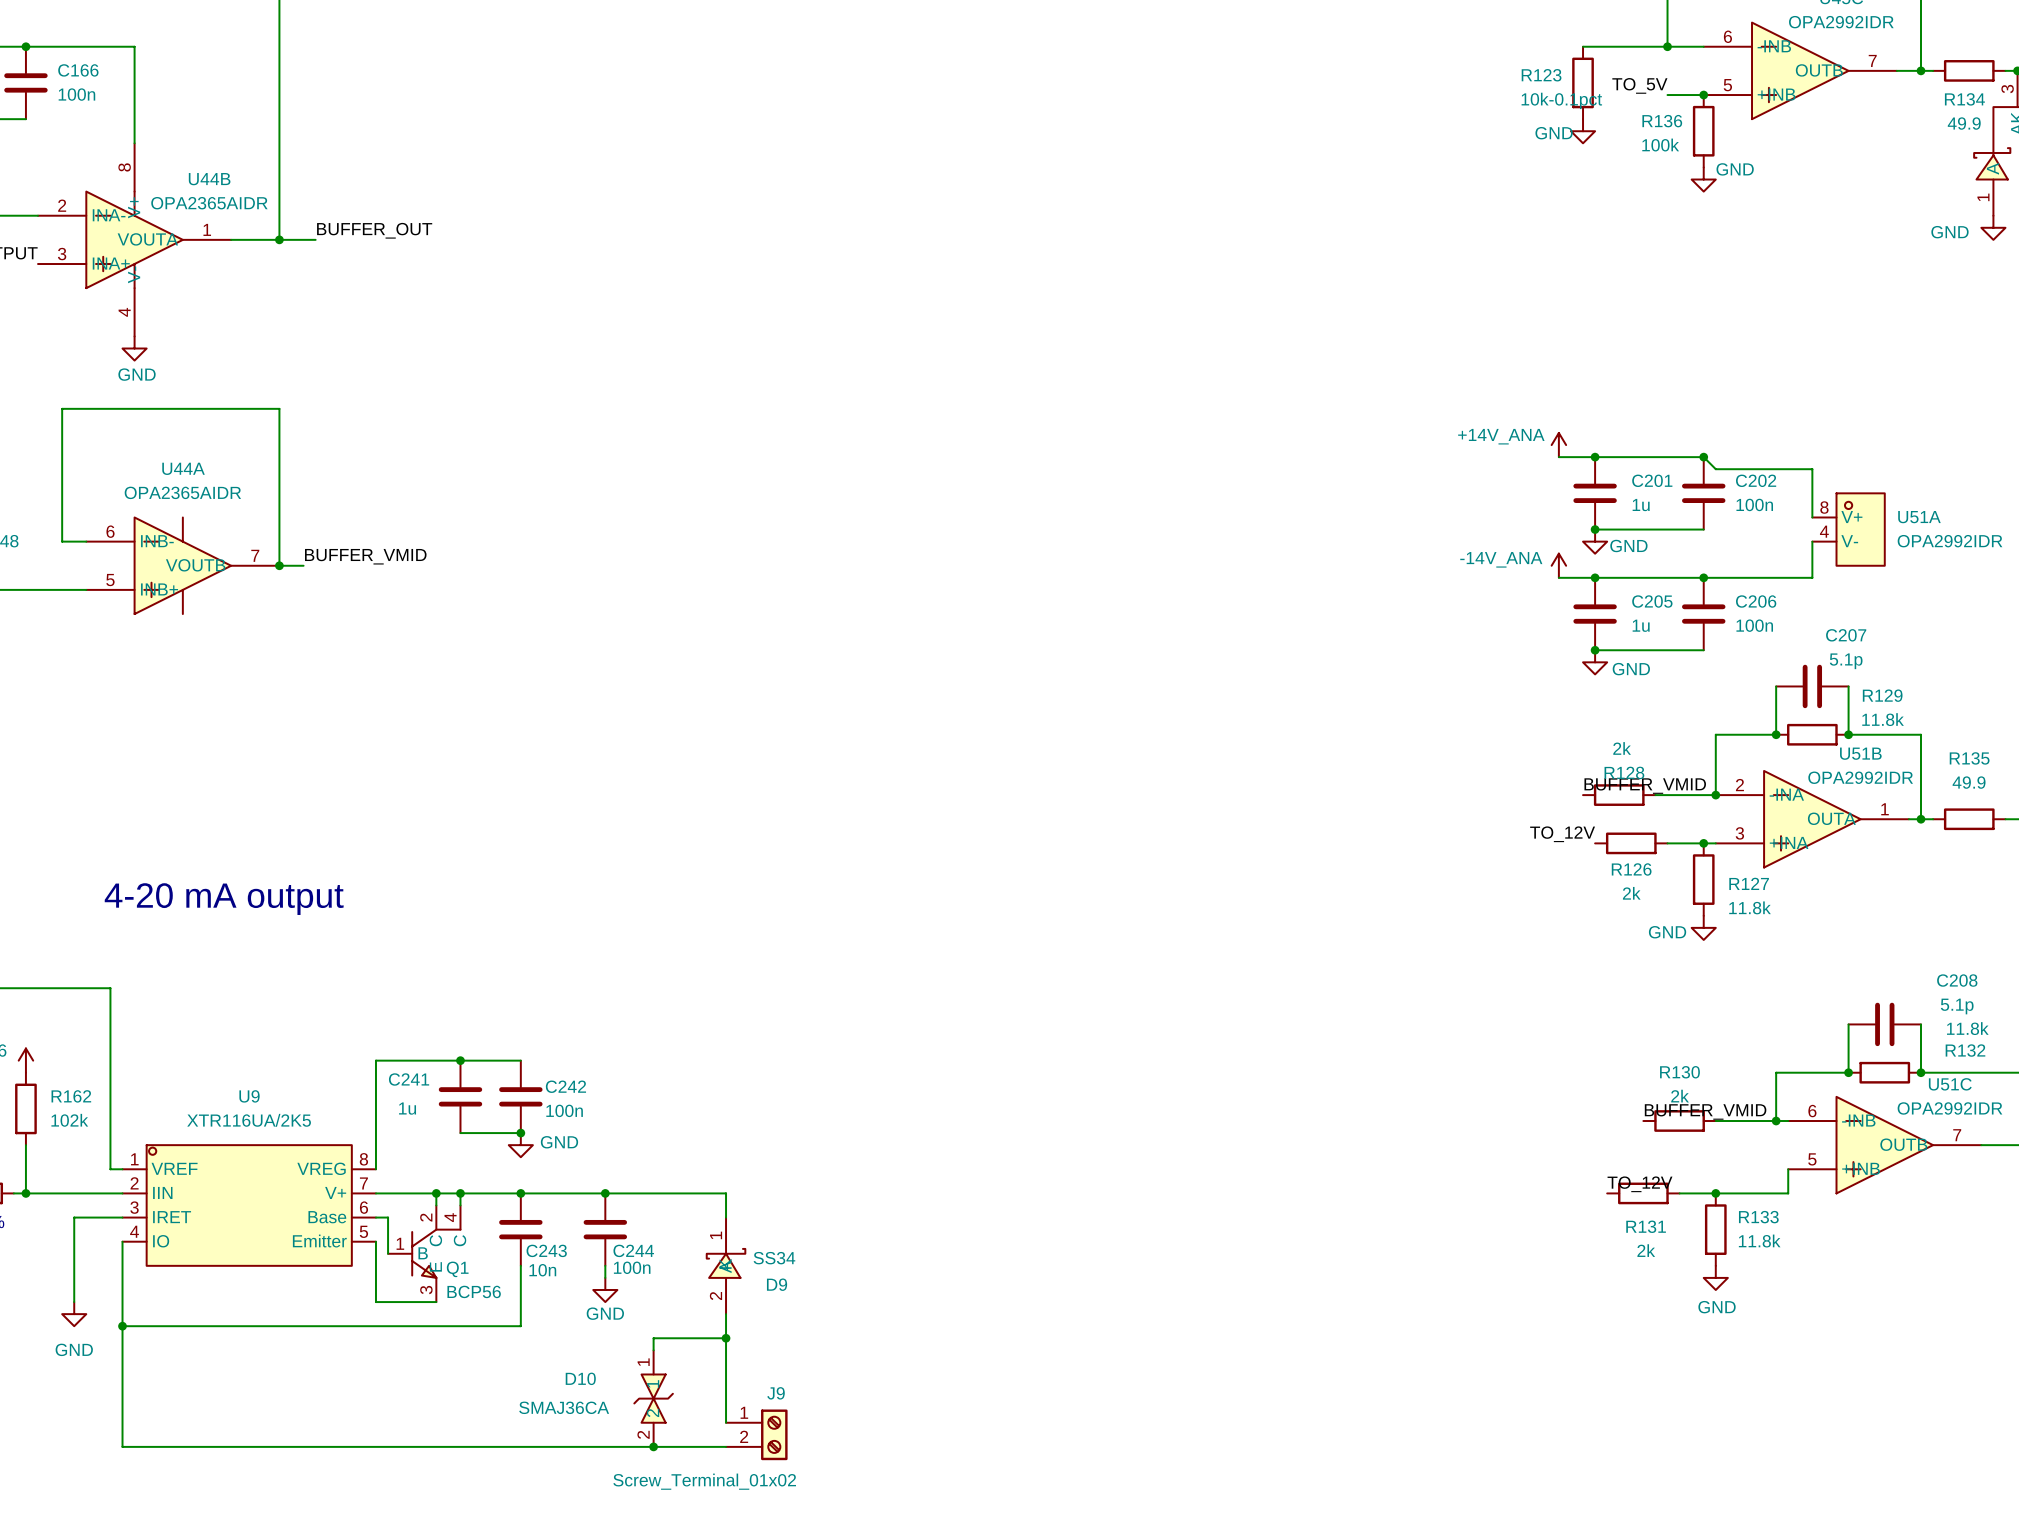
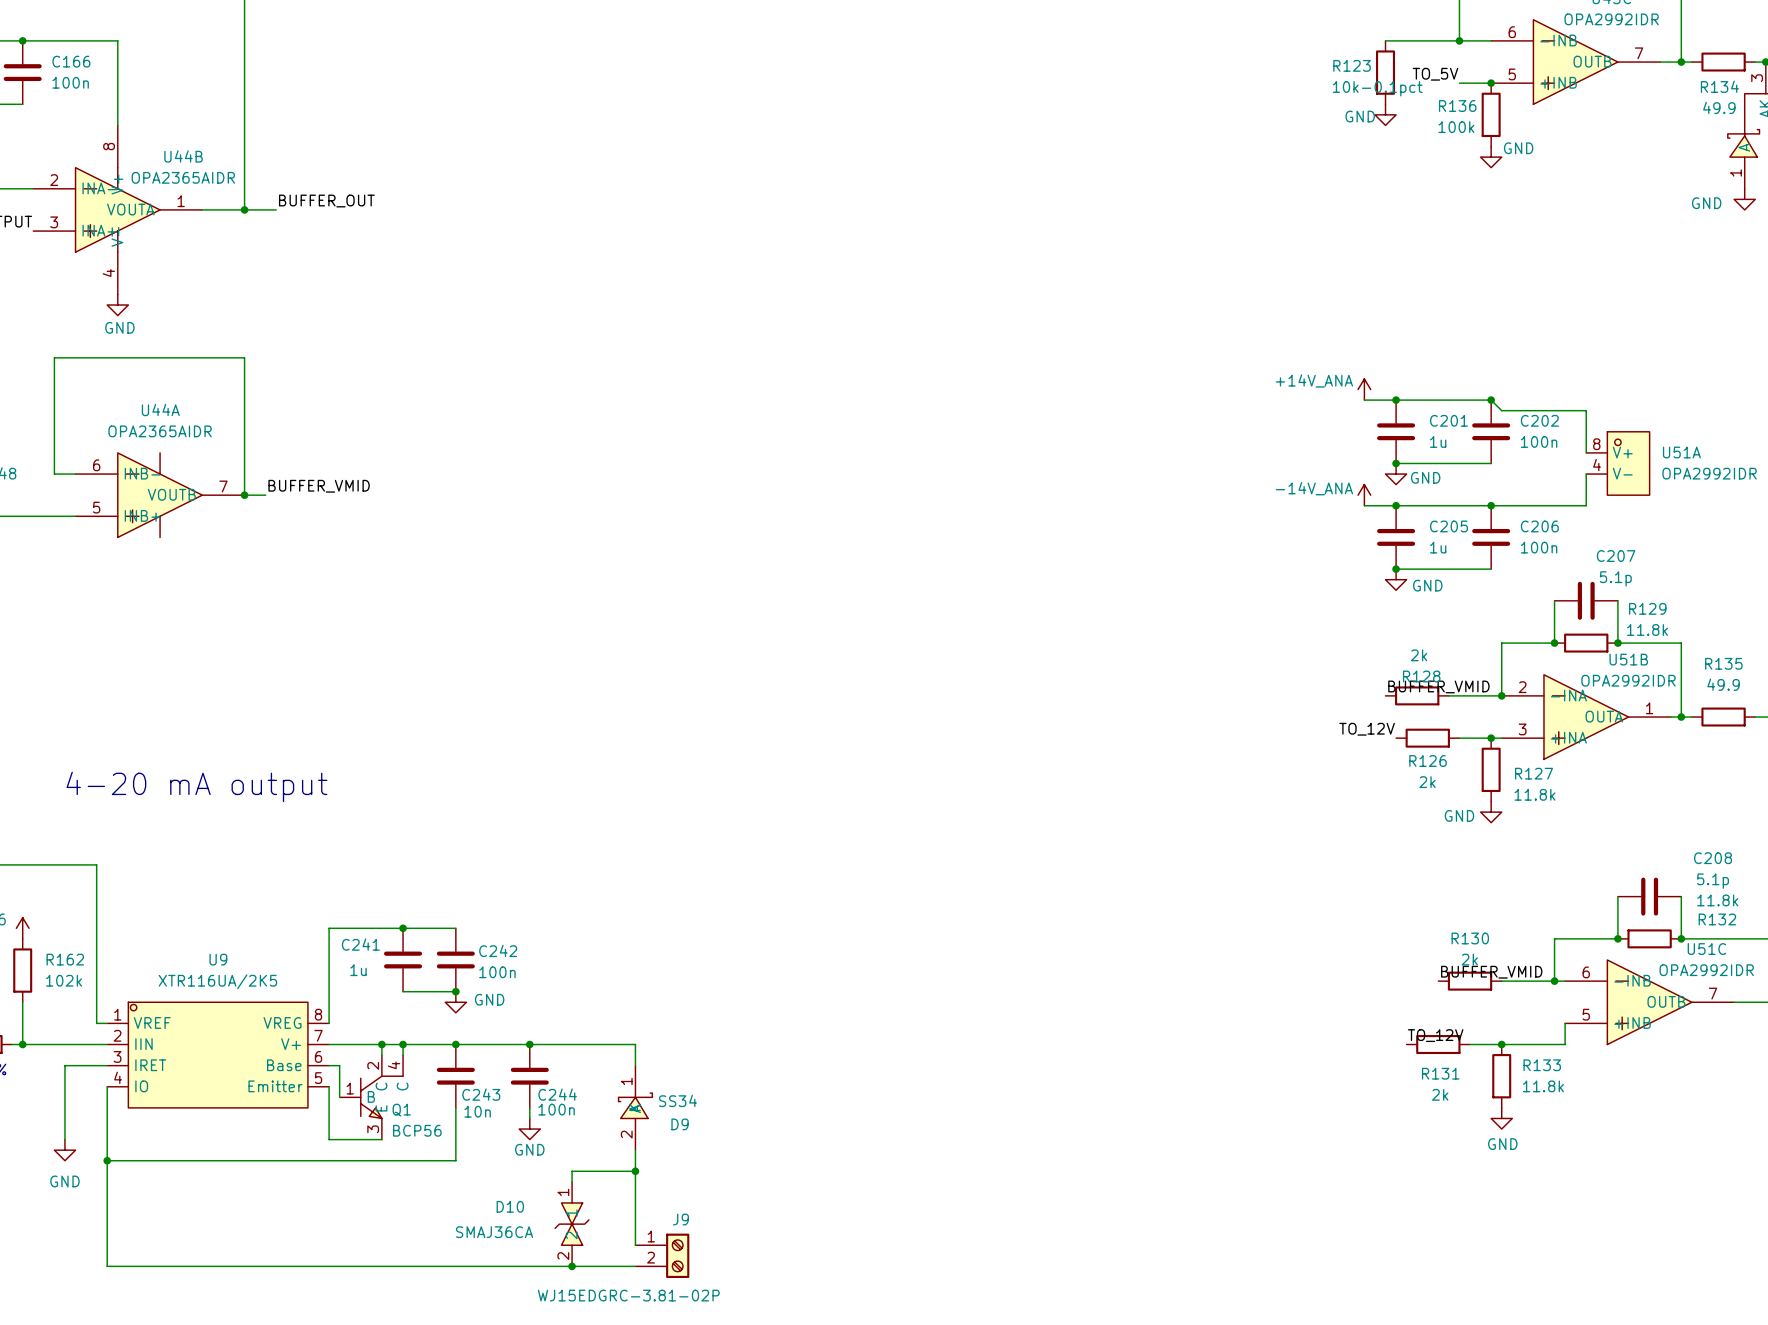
J9 value: Screw_Terminal_01x02 (704, 1481) -> WJ15EDGRC-3.81-02P (628, 1295)

